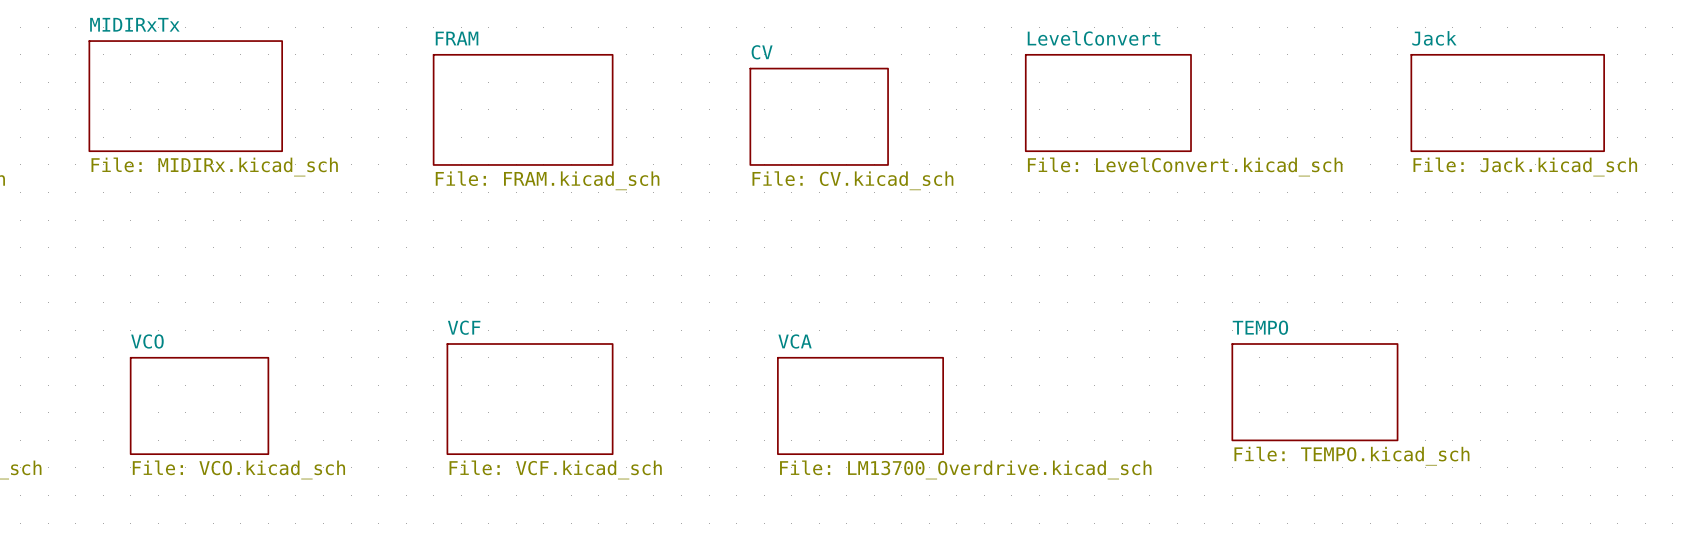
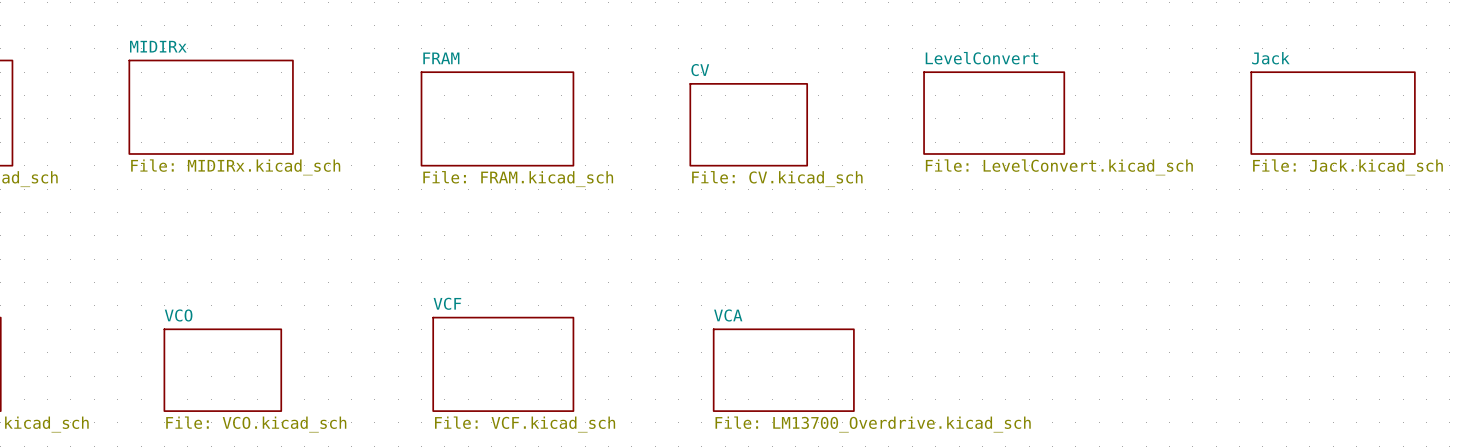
sheet MIDIRxTx name: MIDIRxTx (134, 24) -> MIDIRx (158, 46)
sheet TEMPO: File: TEMPO.kicad_sch (1314, 392) -> none

